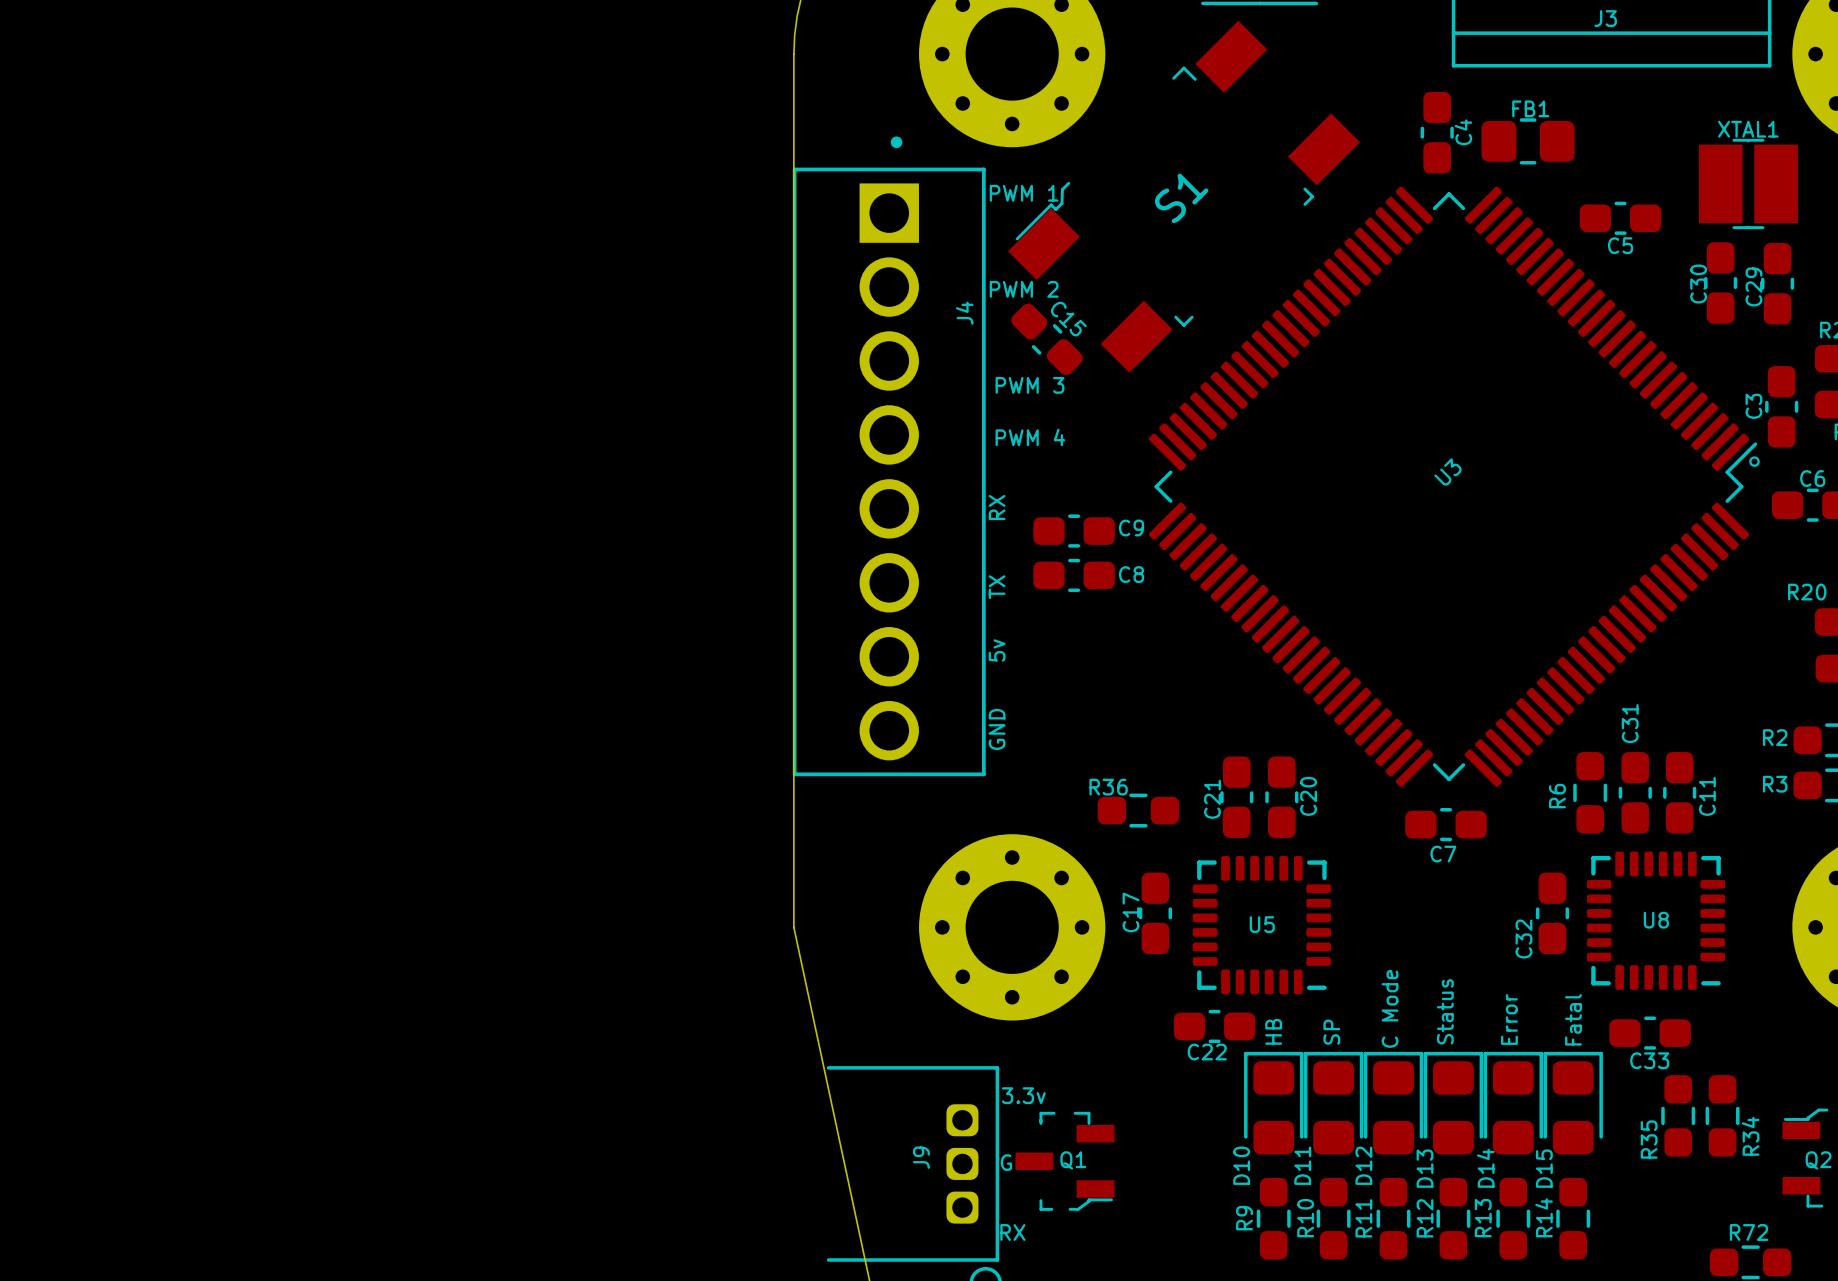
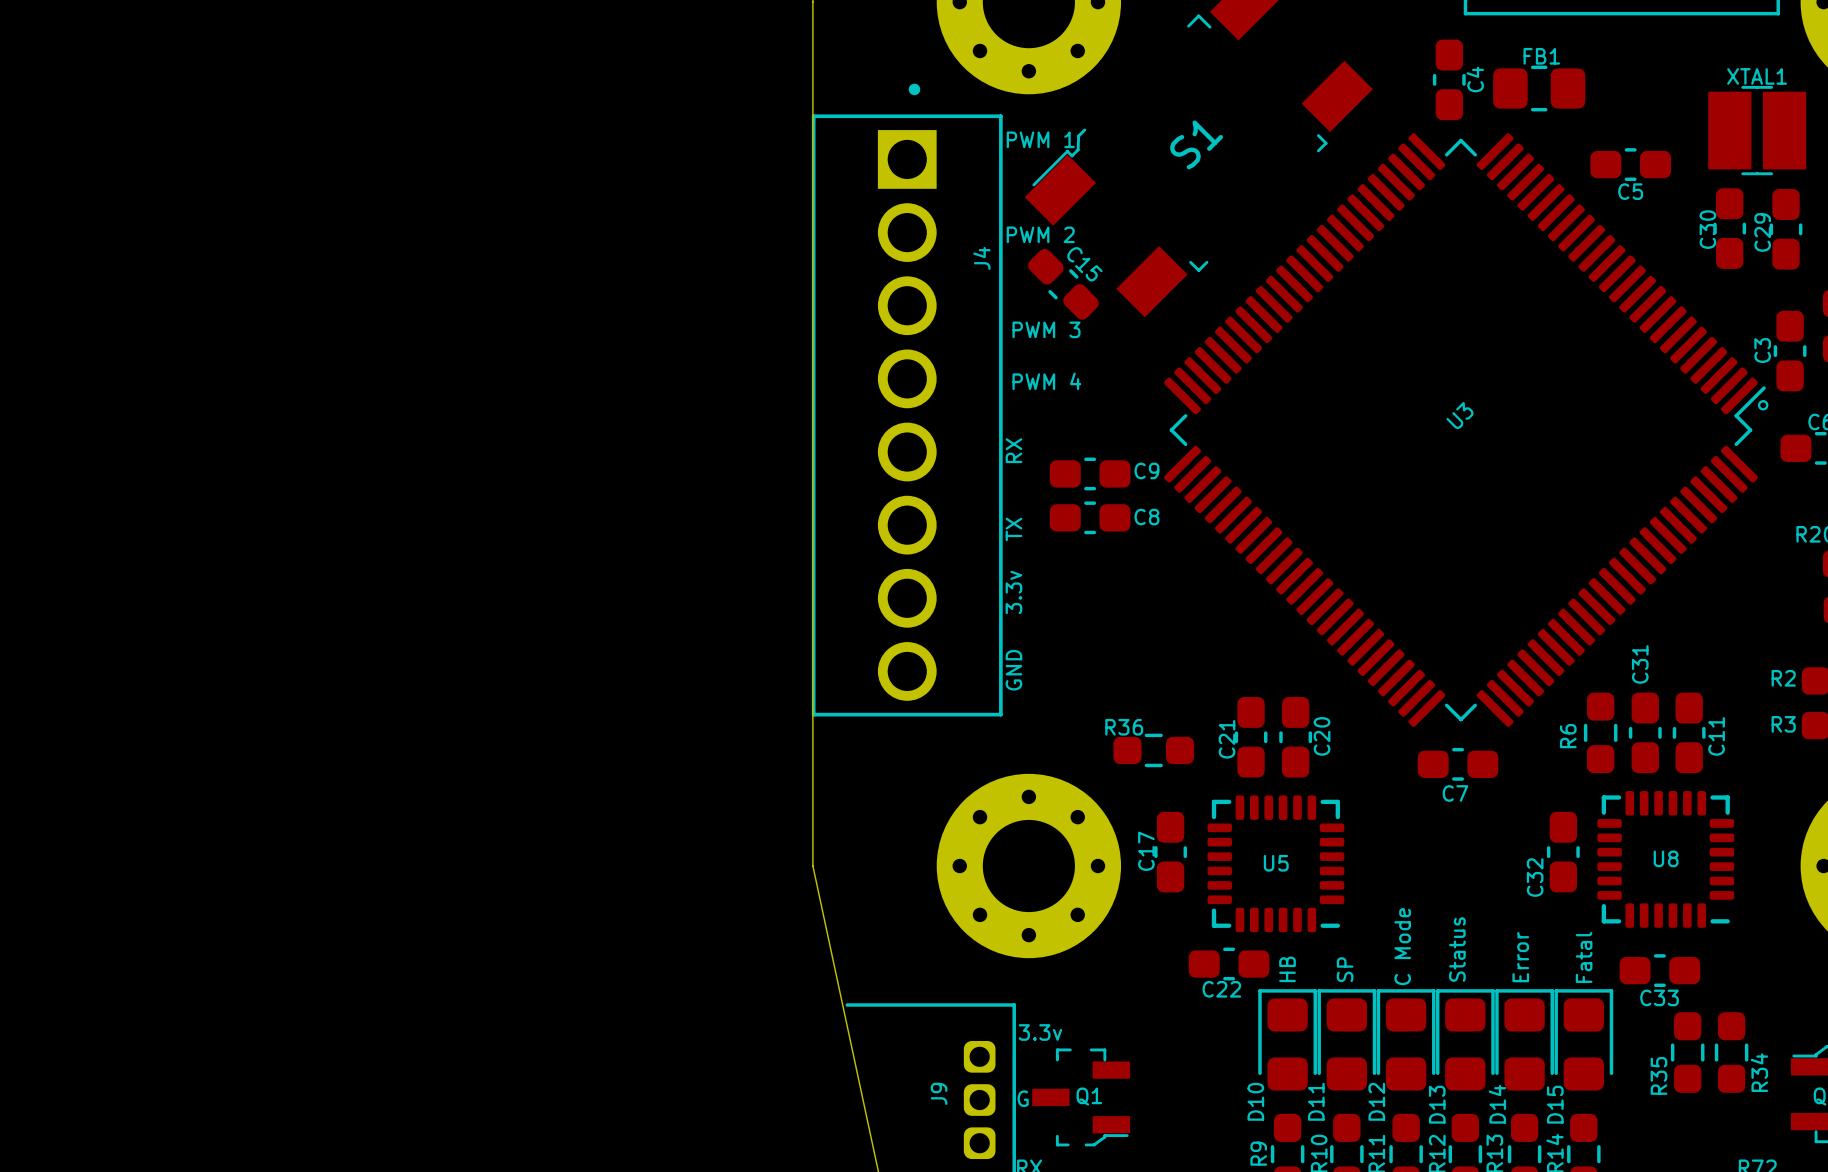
text: 5v (997, 650) -> 3.3v (1013, 592)

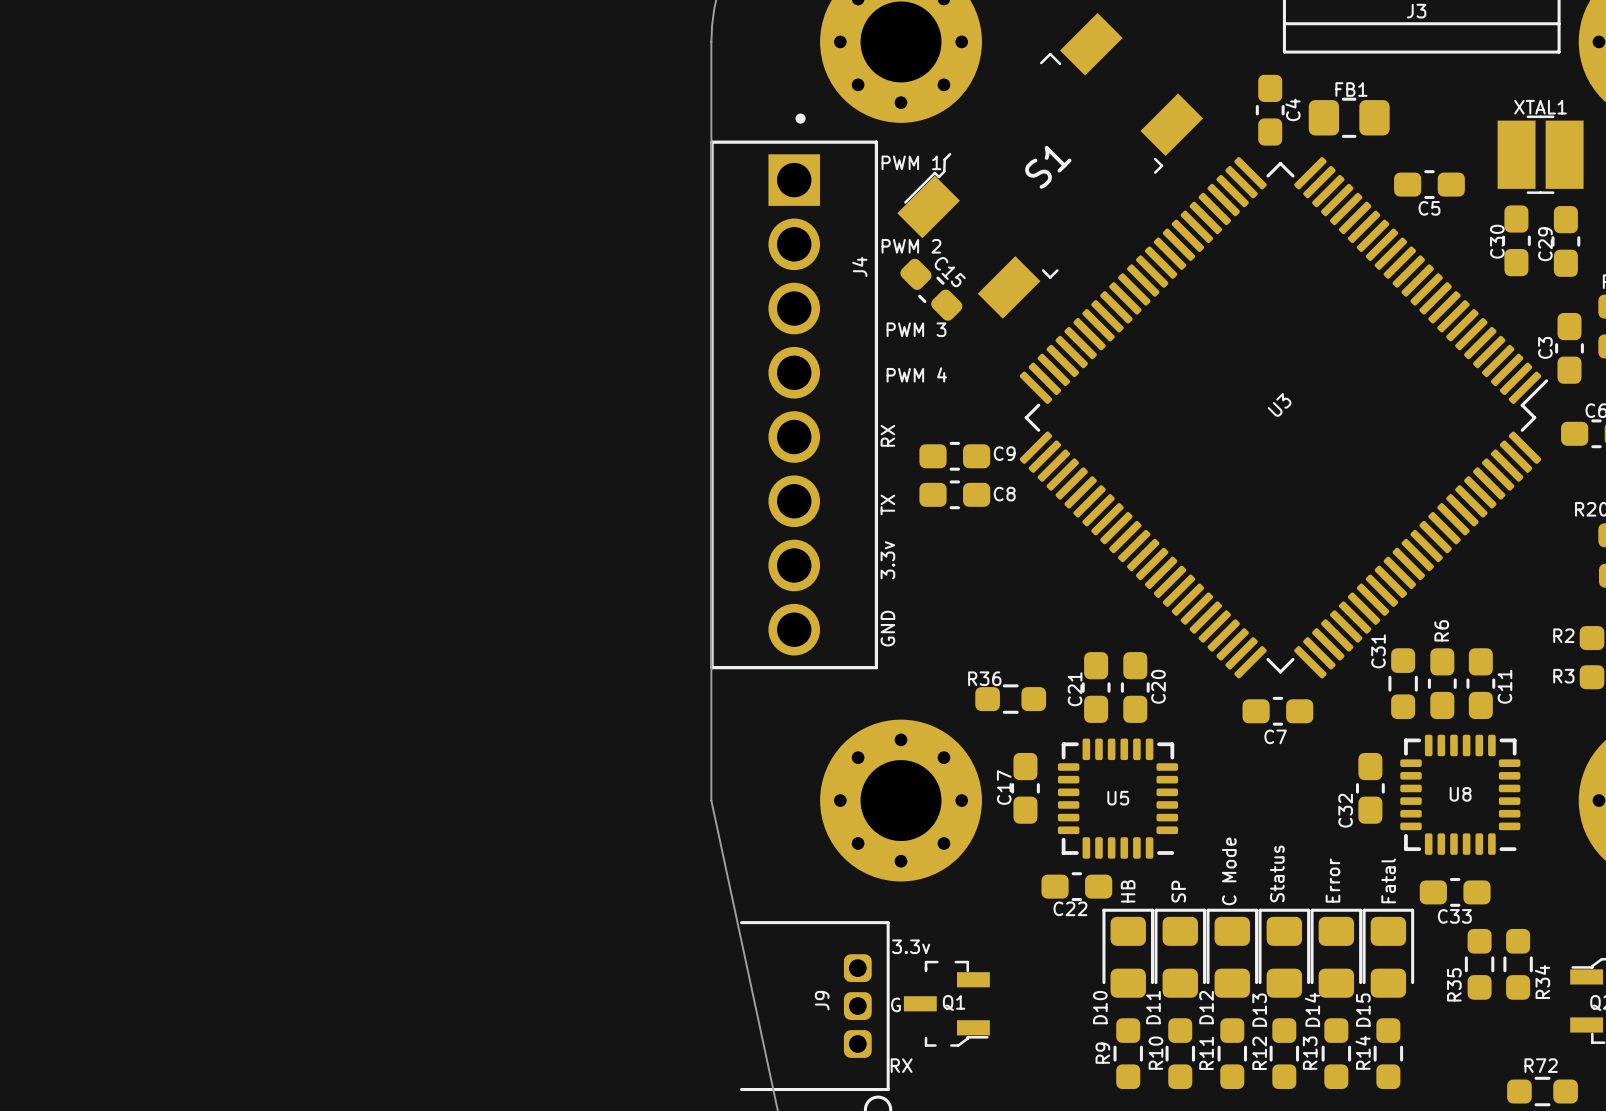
drawing: [1757, 400, 1769, 411] -> none
C31 name position: C31 (1640, 664) -> C31 (1378, 651)
R6 name position: R6 (1568, 736) -> R6 (1441, 630)

